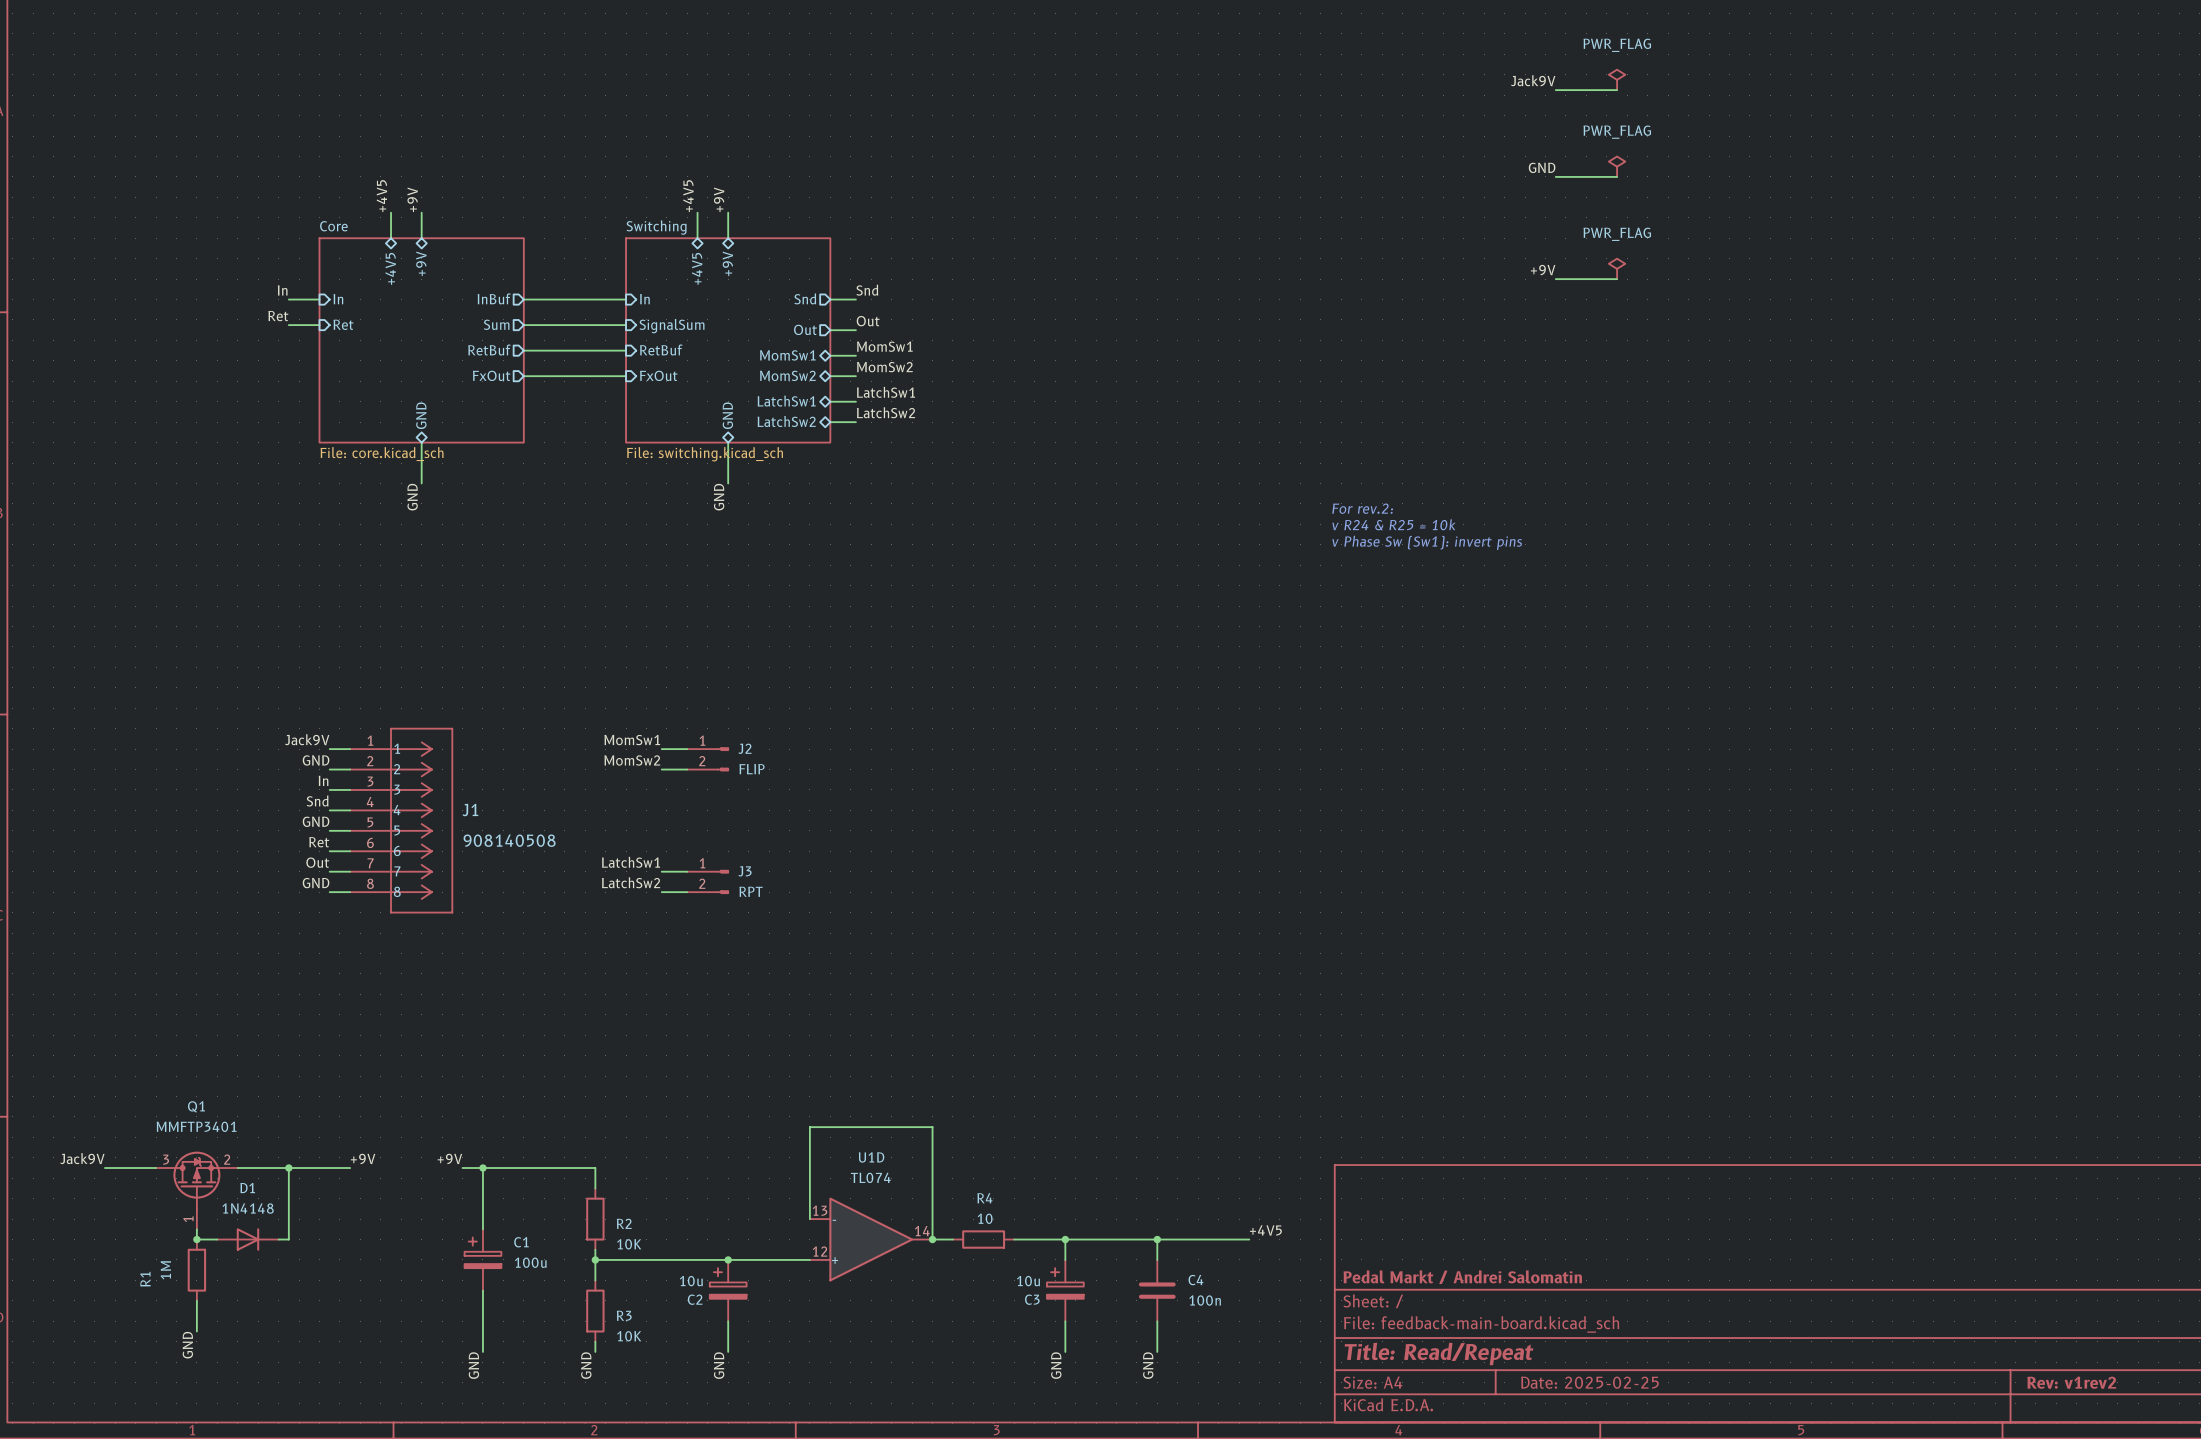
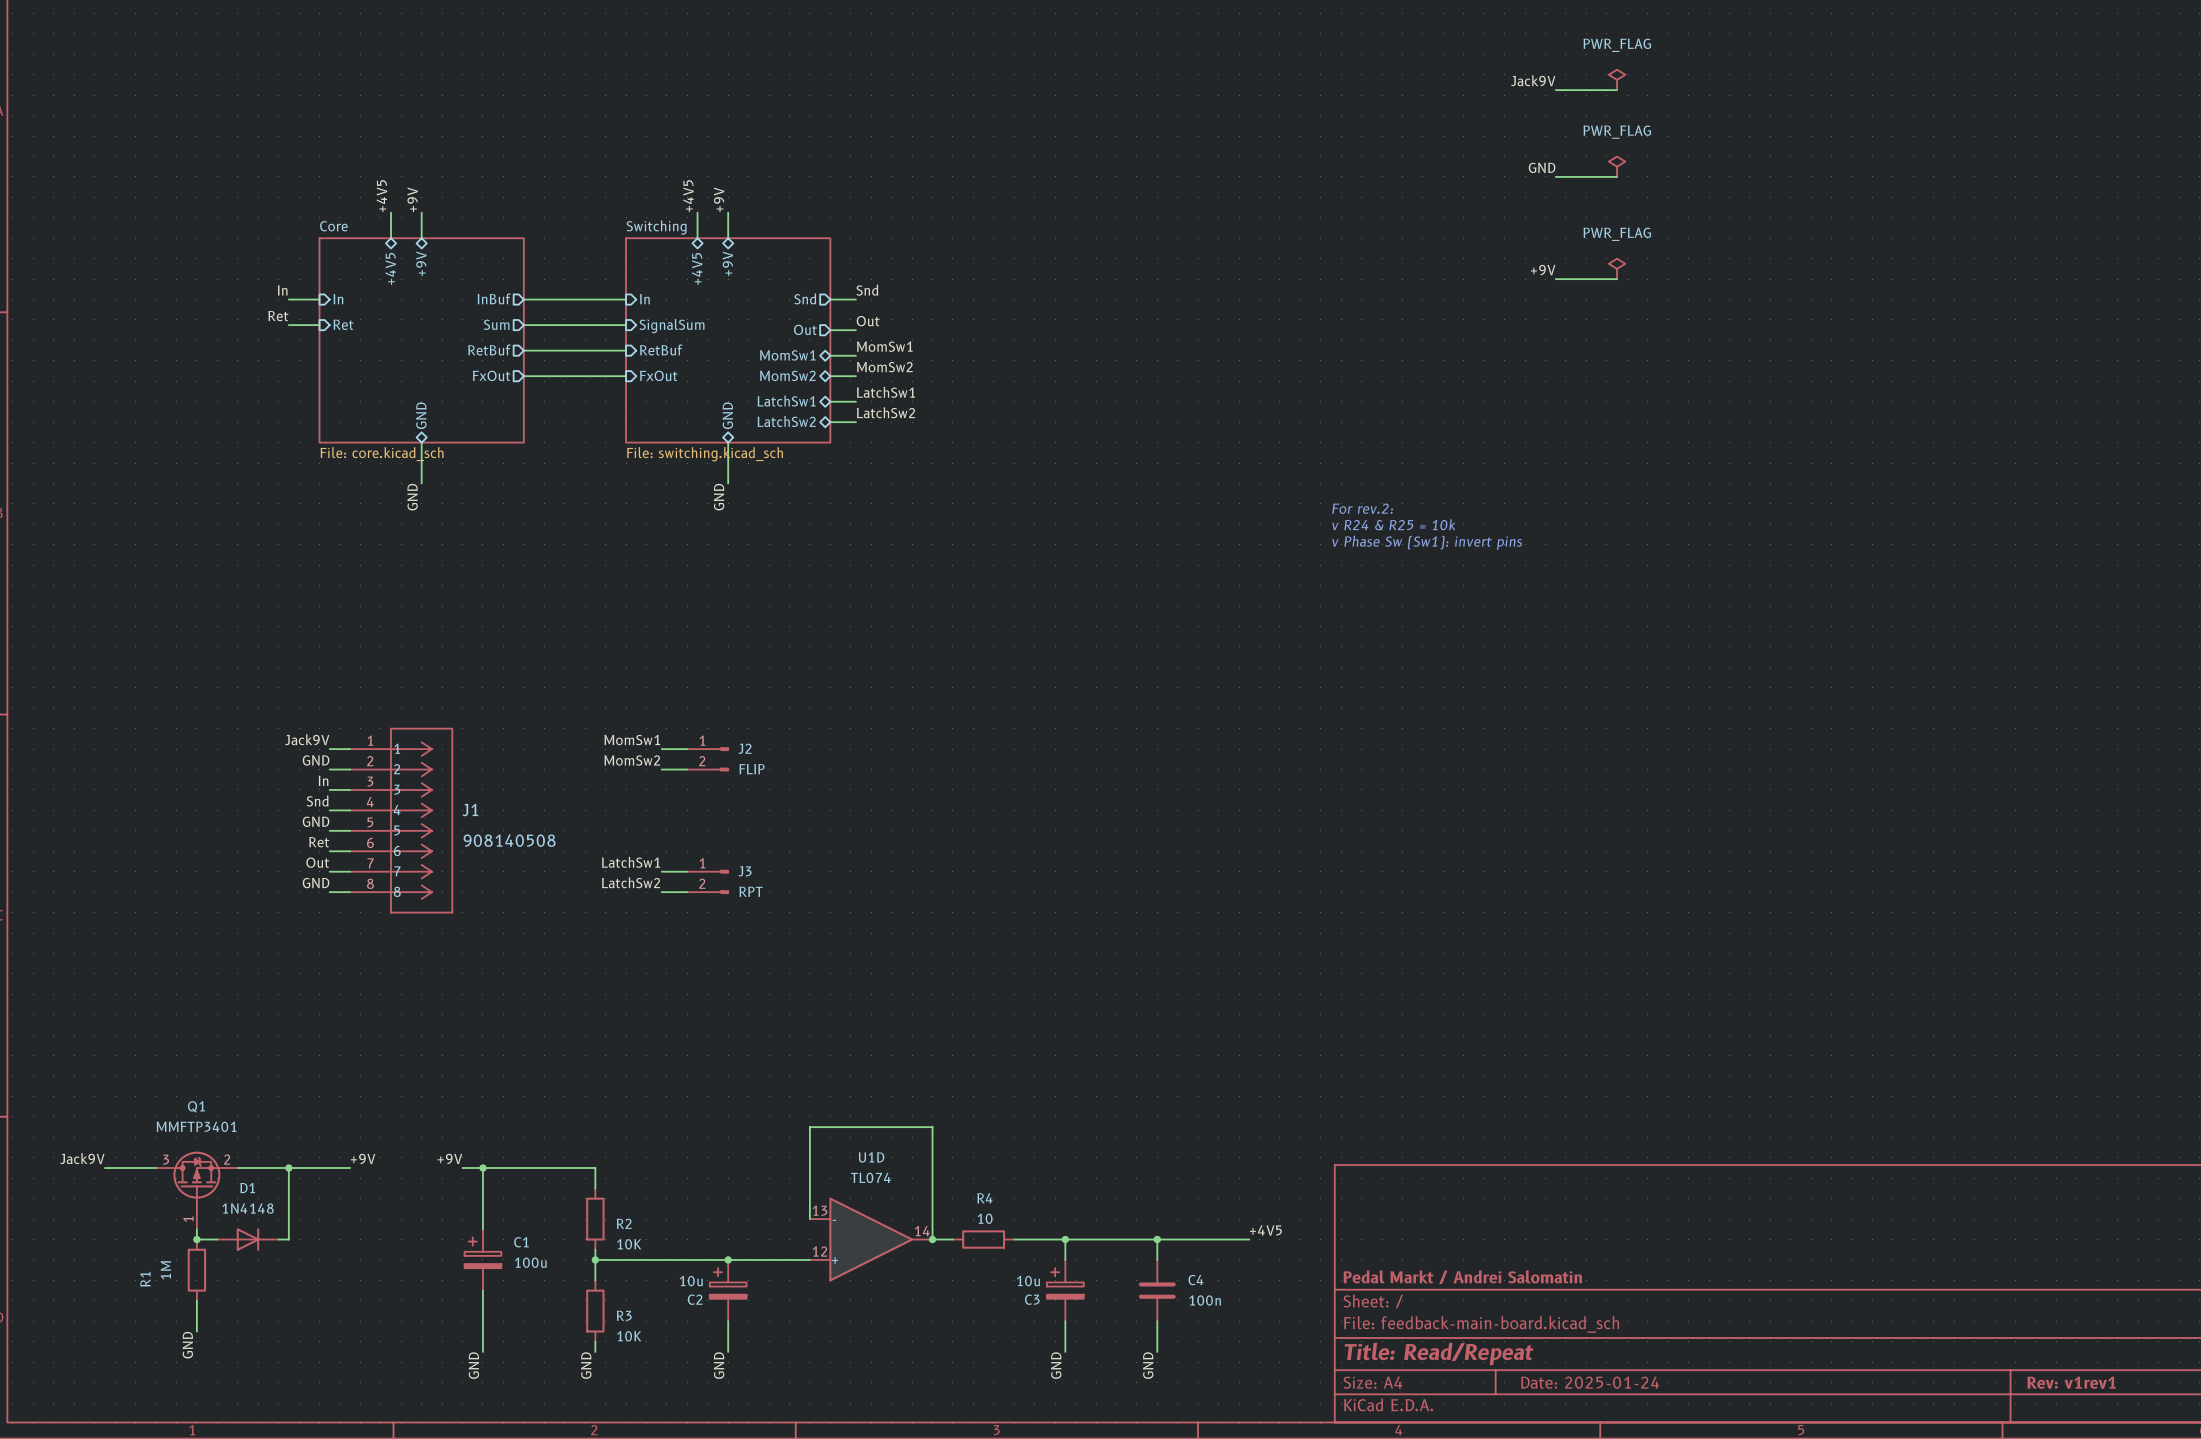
title block: Date: 2025-02-25 (1589, 1382) -> Date: 2025-01-24 (1590, 1382)
title block: Rev: v1rev2 (2071, 1382) -> Rev: v1rev1 (2071, 1382)

